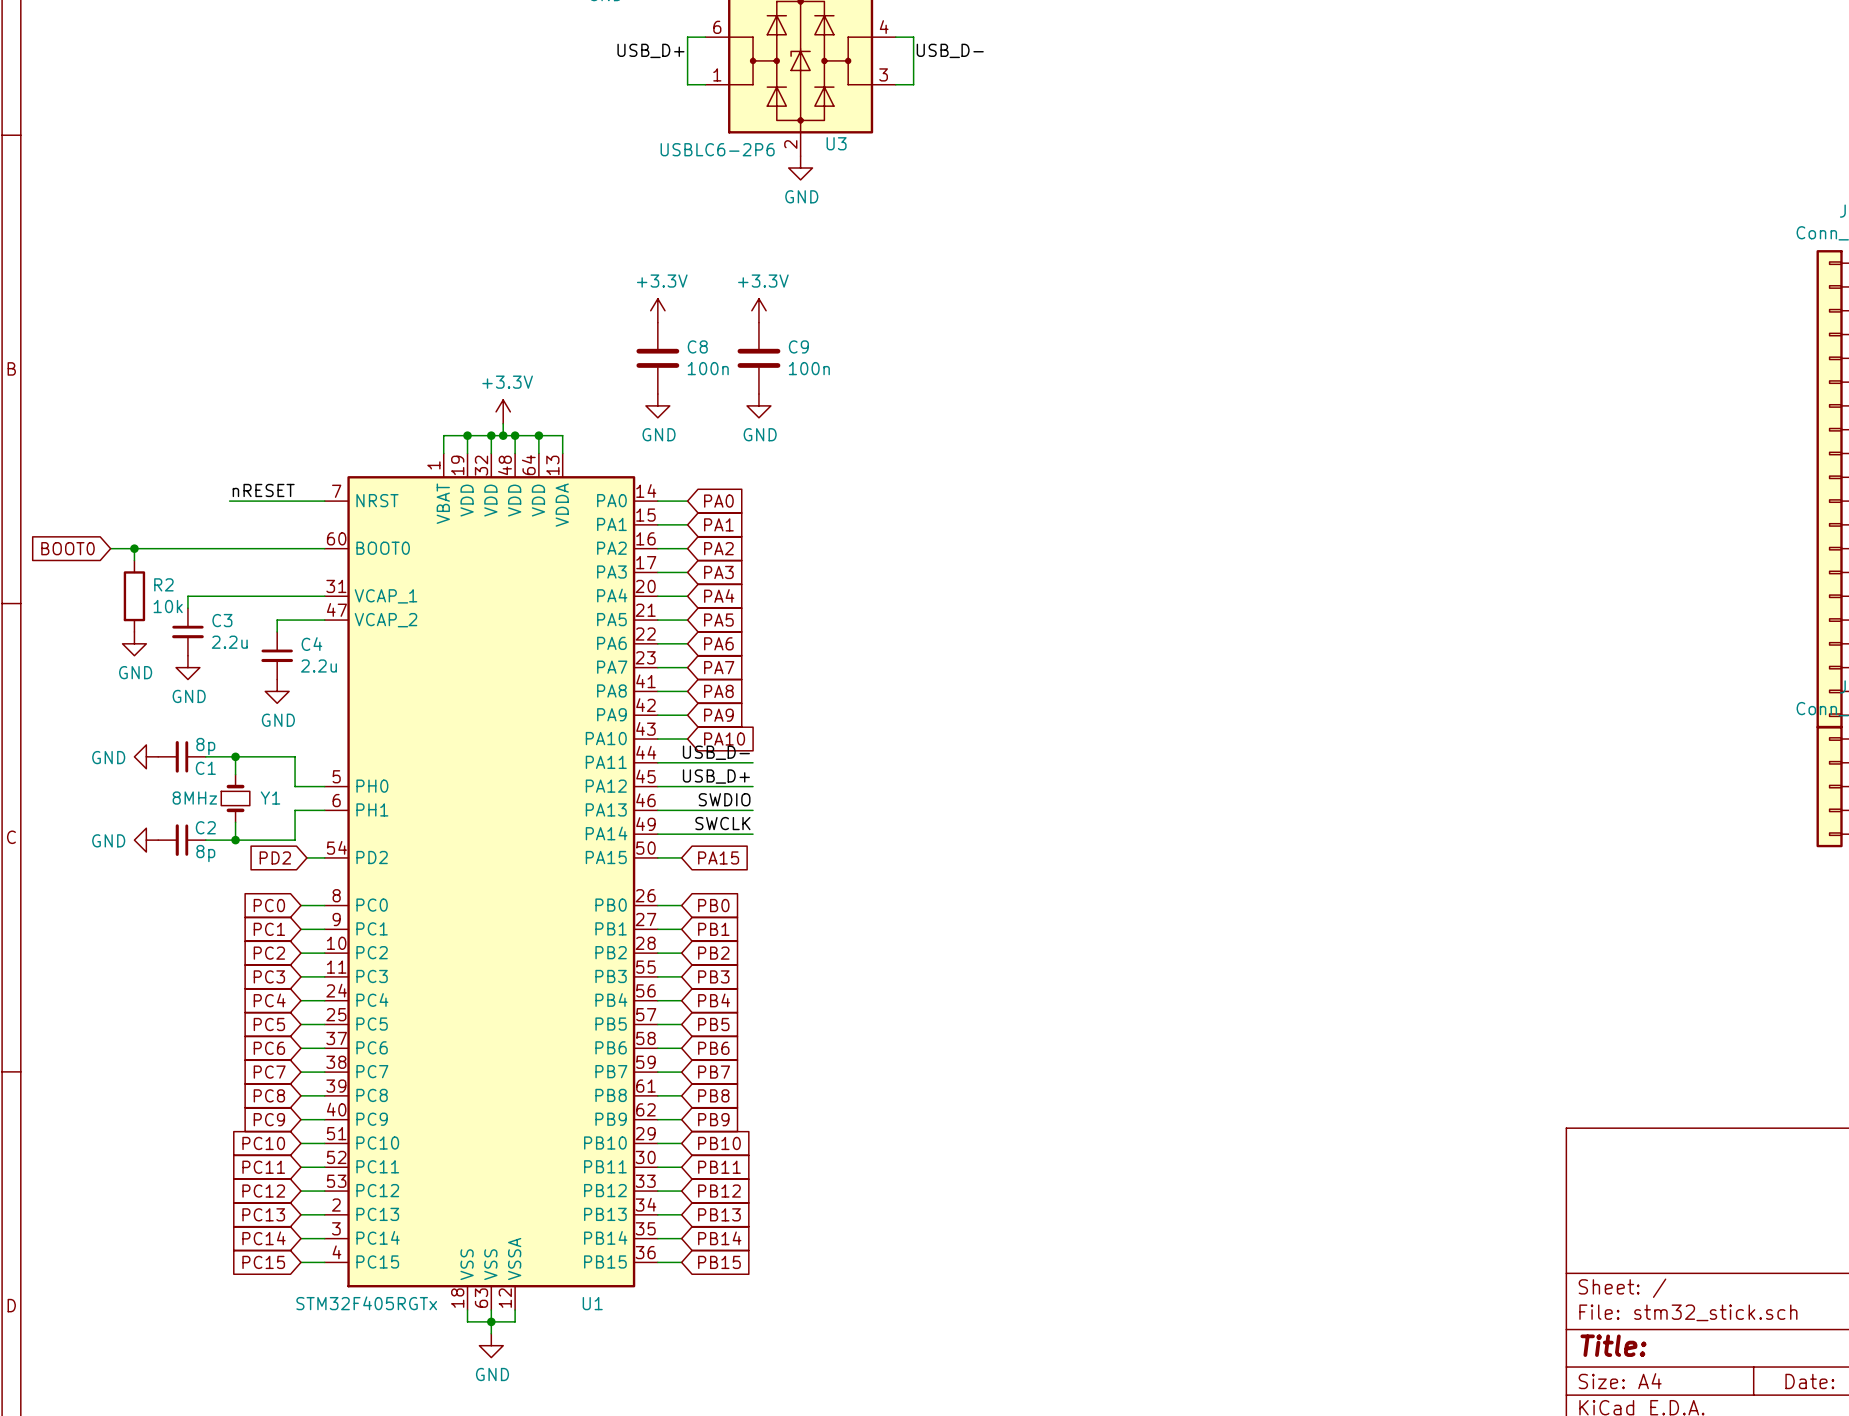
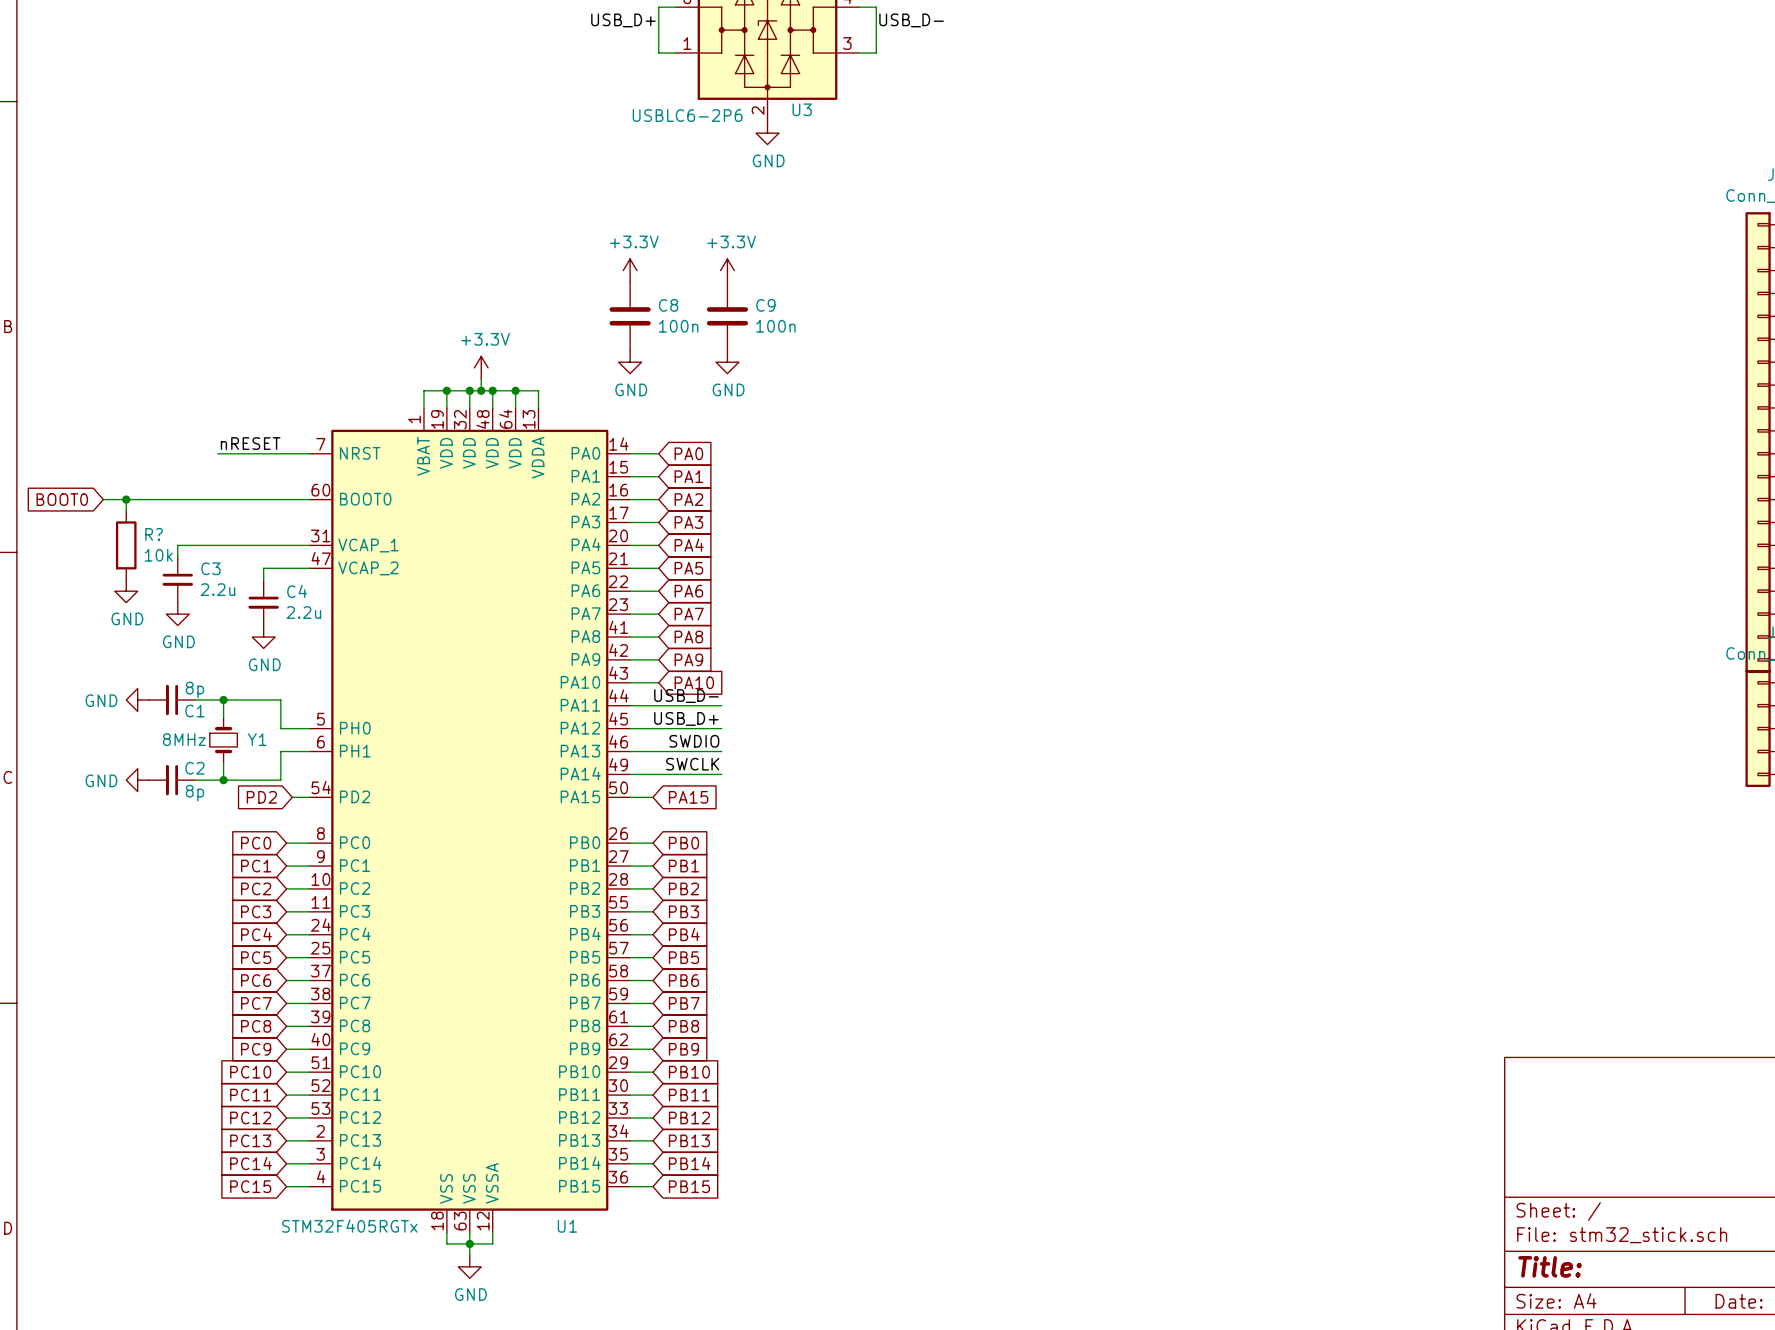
R2 name: R2 (163, 584) -> R? (154, 534)

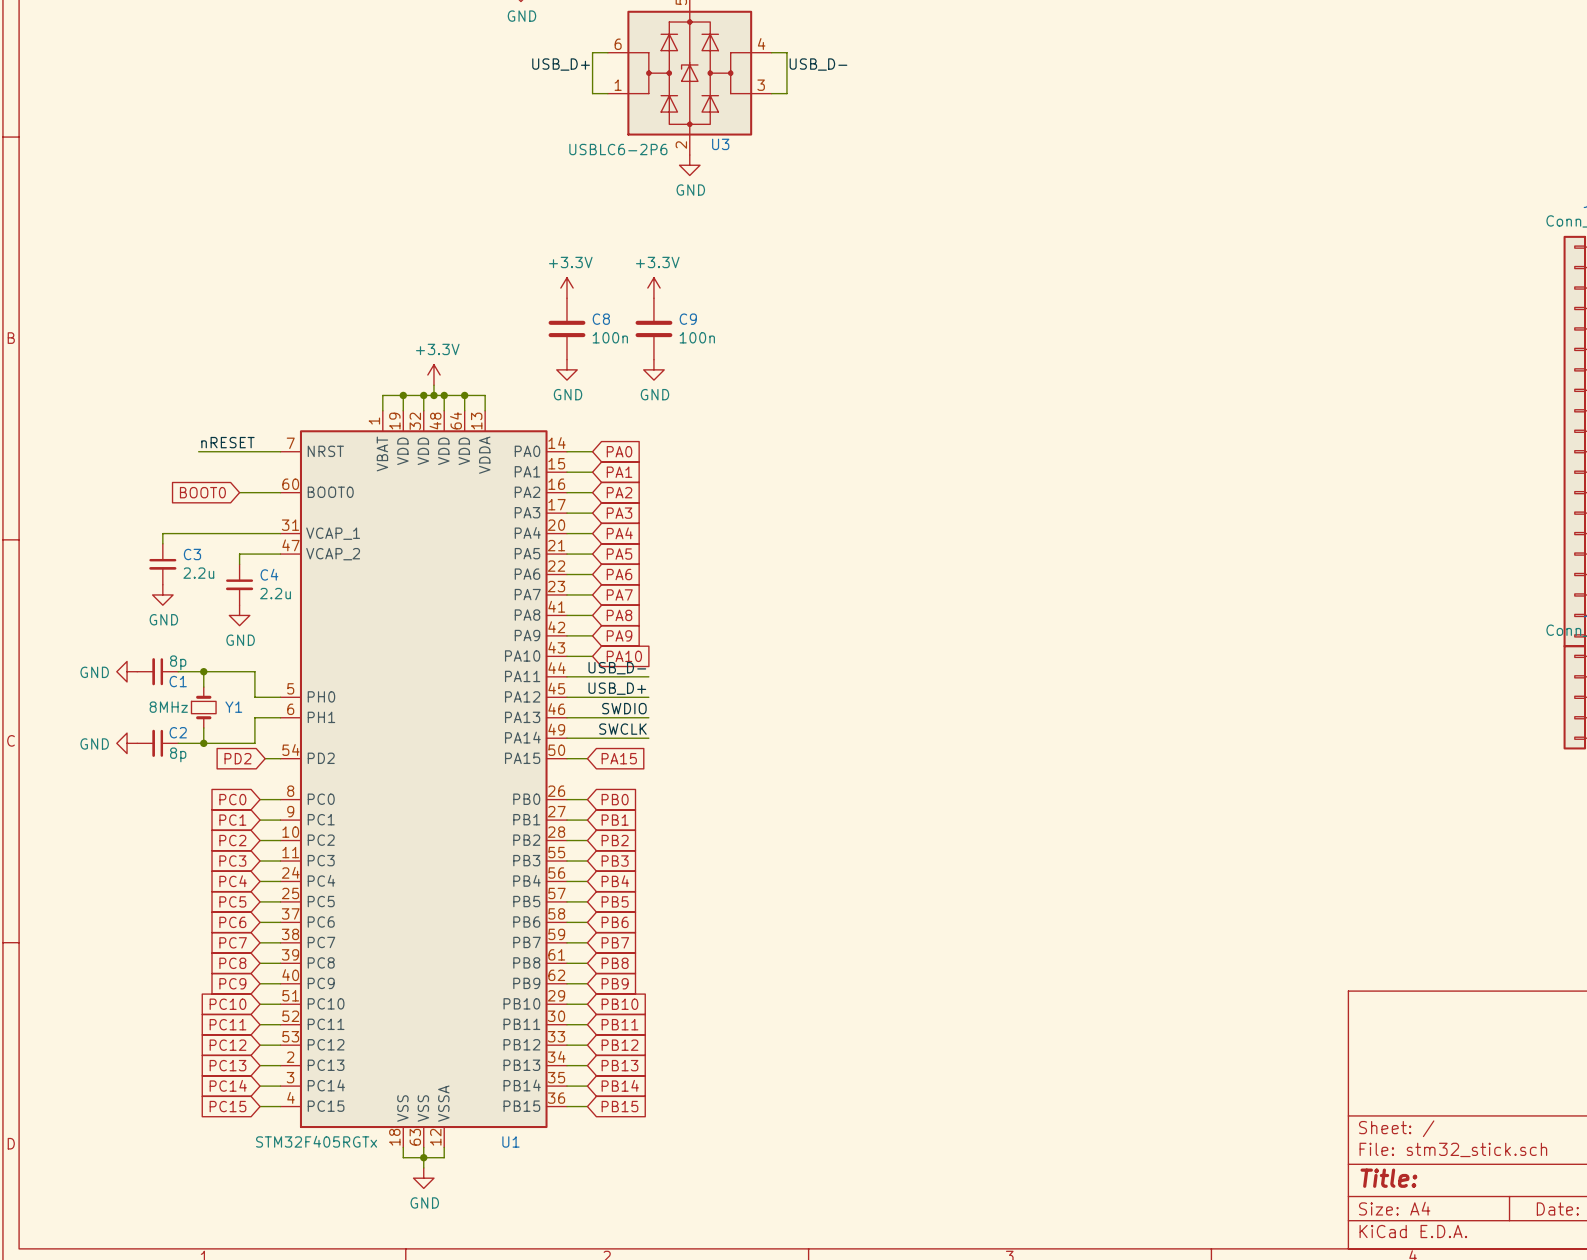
global label position: BOOT0 (62, 499) -> BOOT0 (202, 492)
wire: (103, 499) (263, 499) -> none
wire: (126, 499) (126, 511) -> none
junction: (126, 499) -> none
R?: 10k (126, 545) -> none
power symbol: GND (126, 591) -> none

